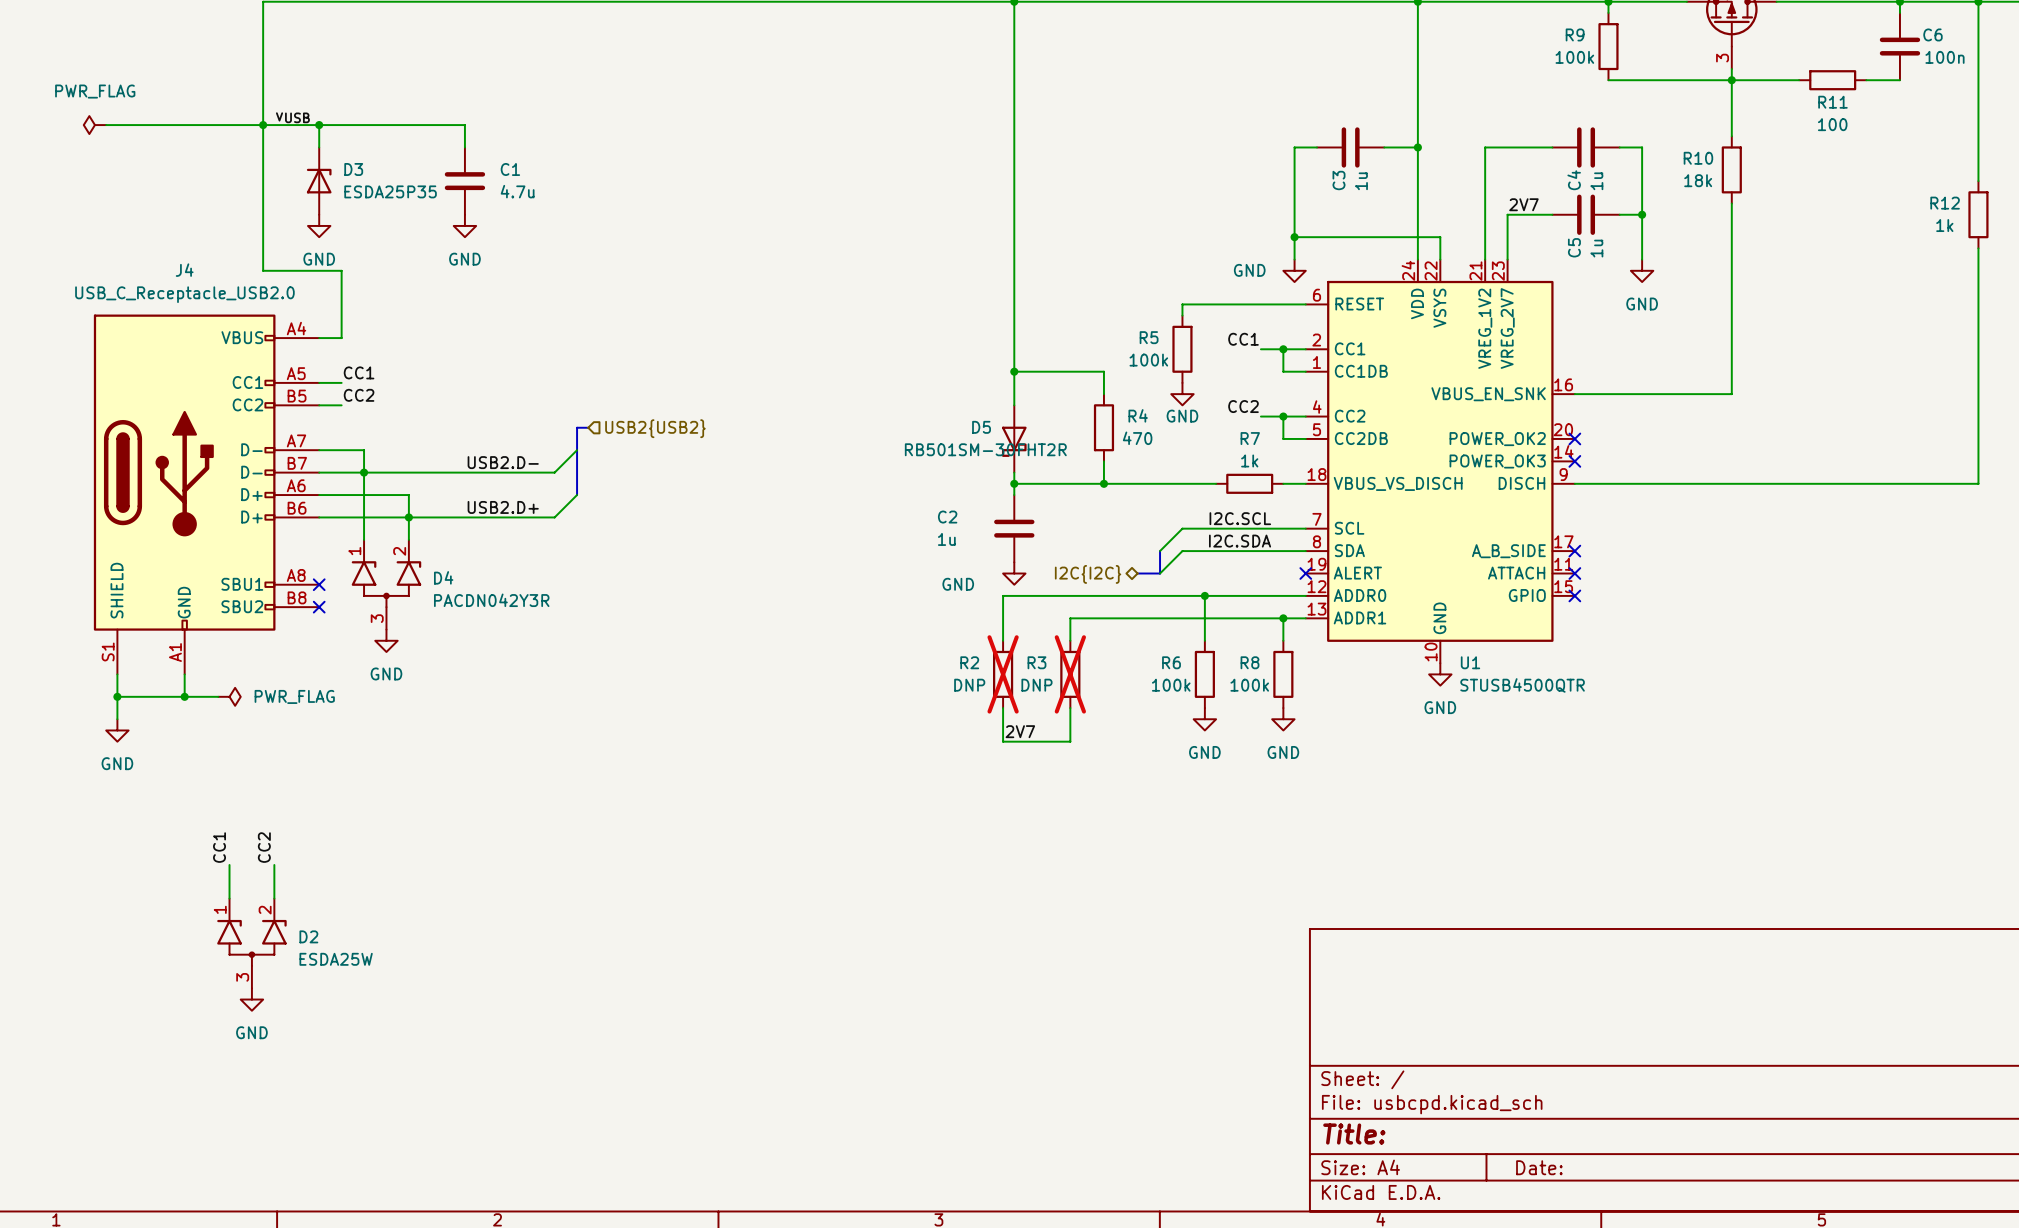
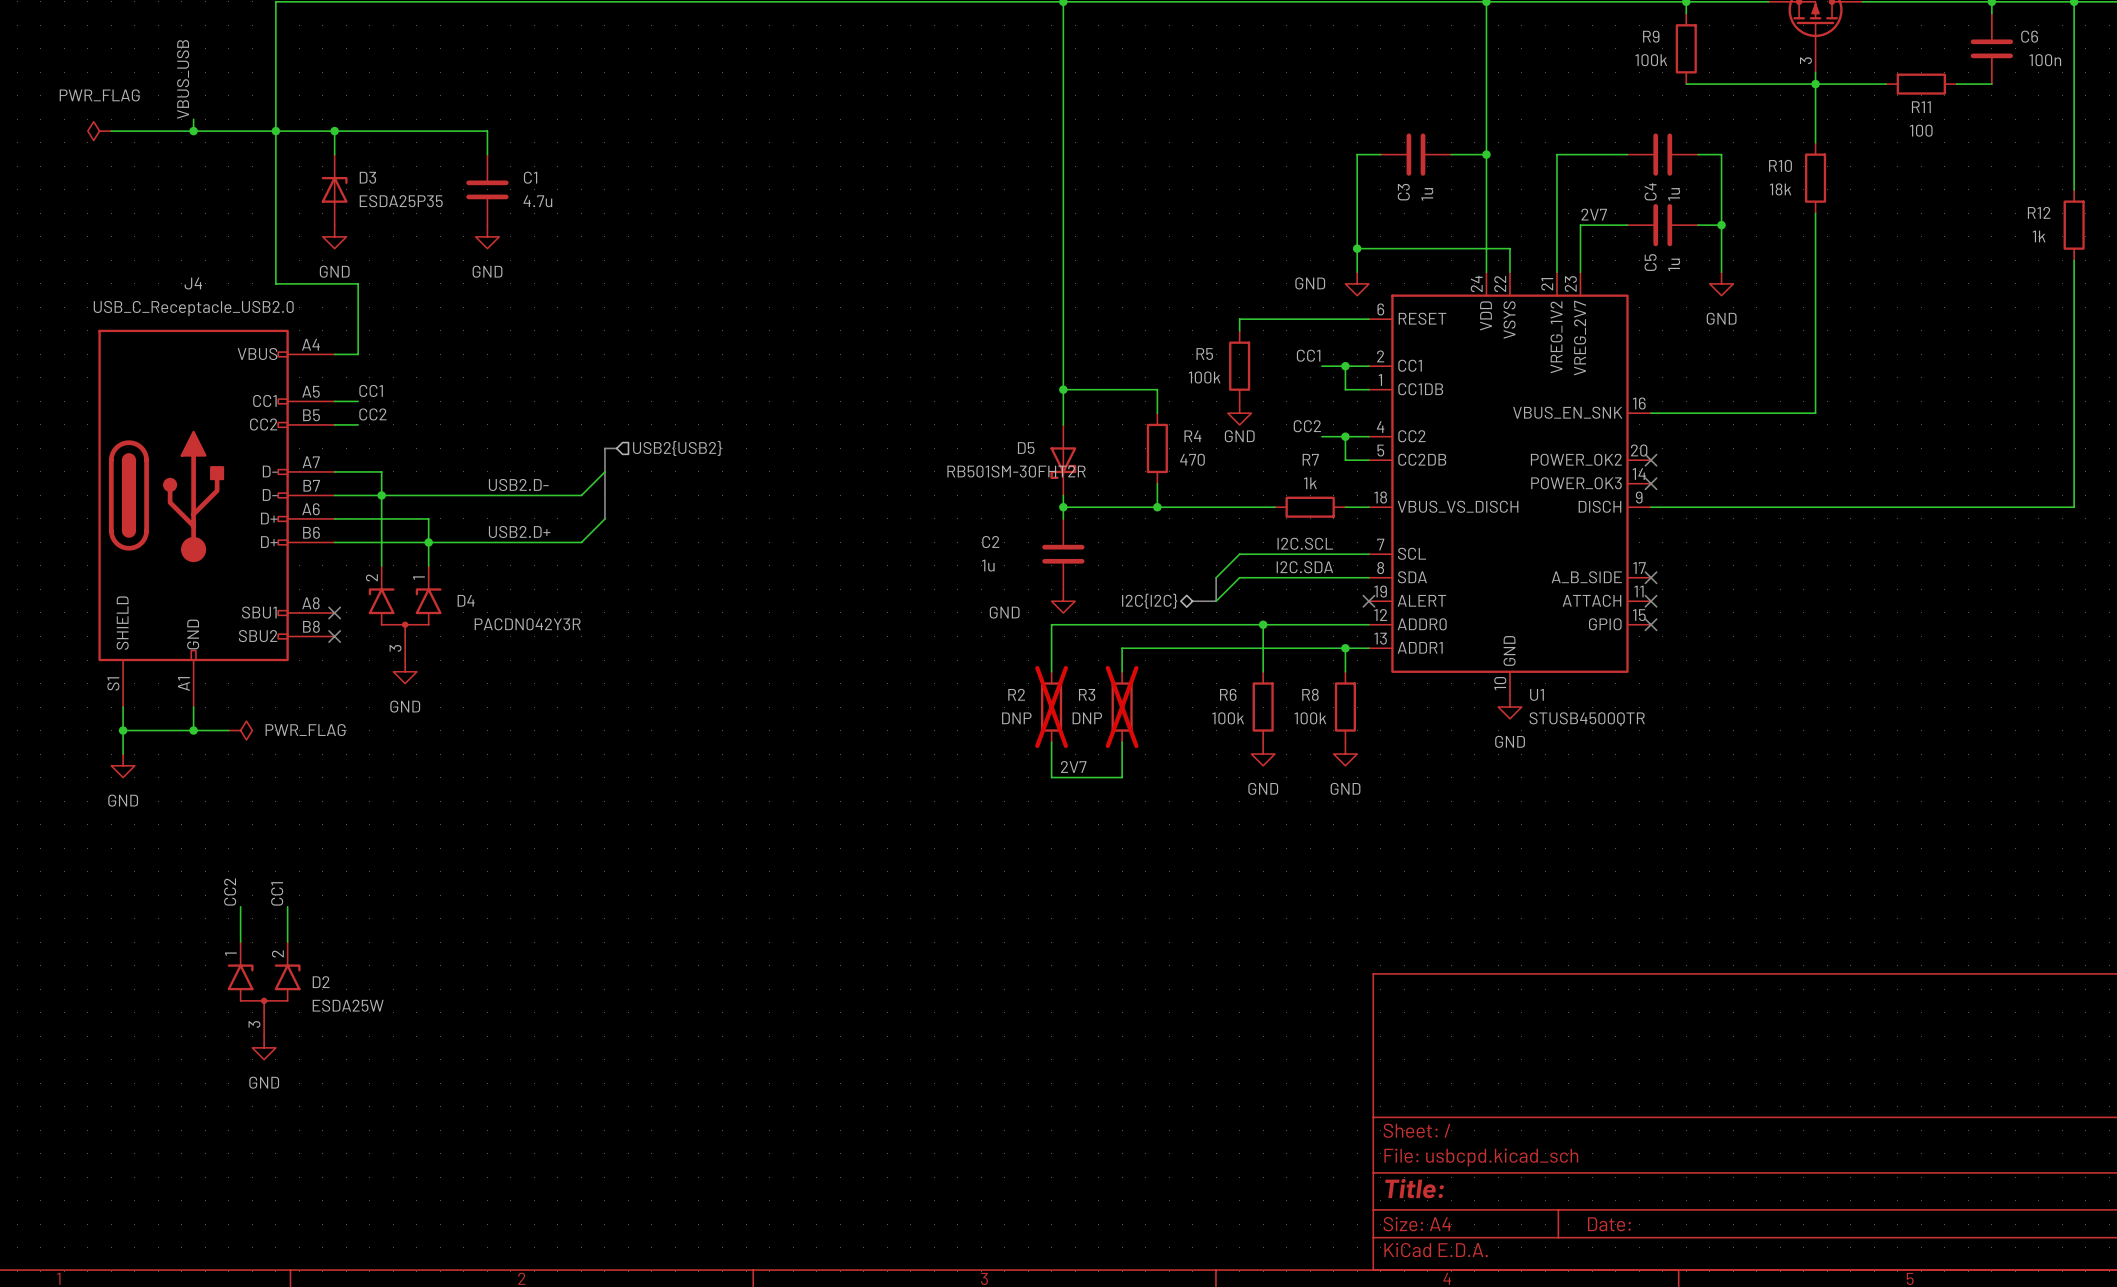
label: none -> VBUS_USB (183, 79)
wire: none -> (193, 119) (193, 131)
label: vUSB (292, 117) -> none
junction: none -> (193, 131)
D4 flip: as is (386, 584) -> left-right (405, 612)
label: CC1 (219, 847) -> CC2 (230, 892)
label: CC2 (264, 847) -> CC1 (277, 893)

